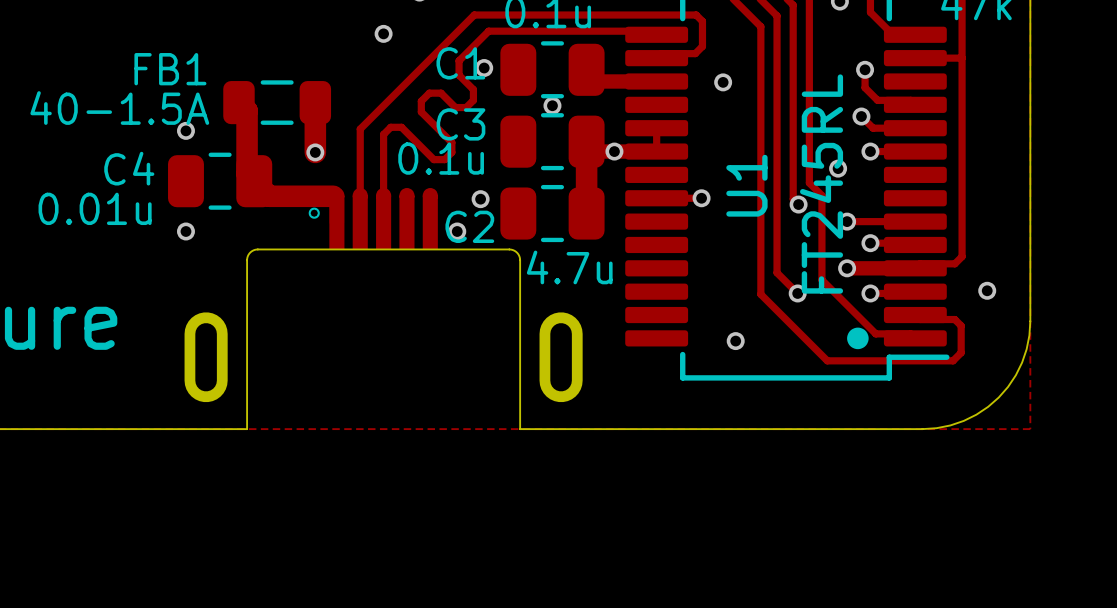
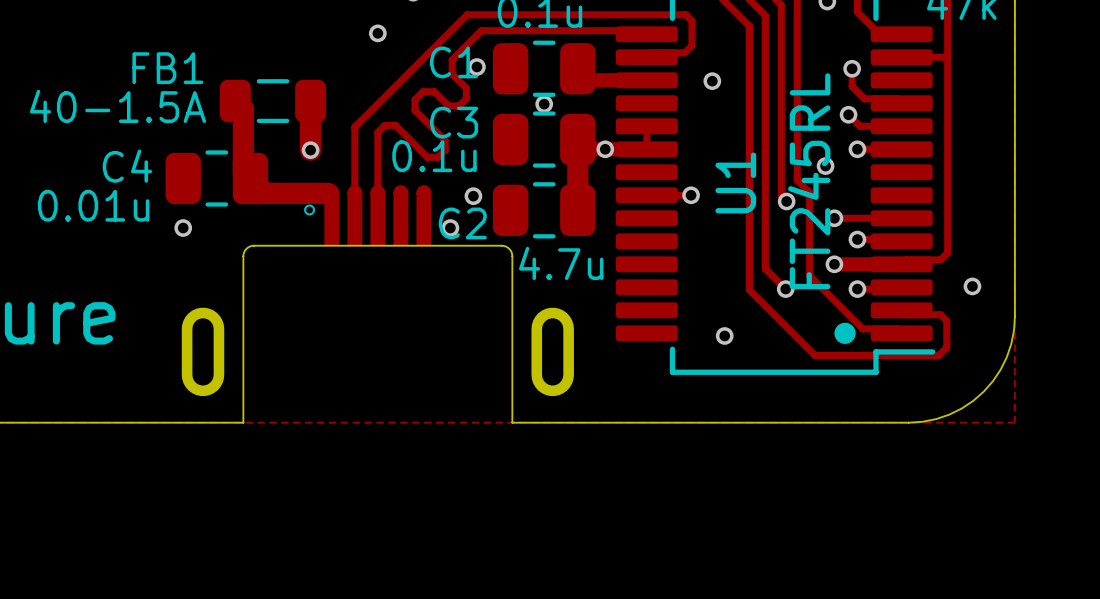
via: (185, 130) -> none

